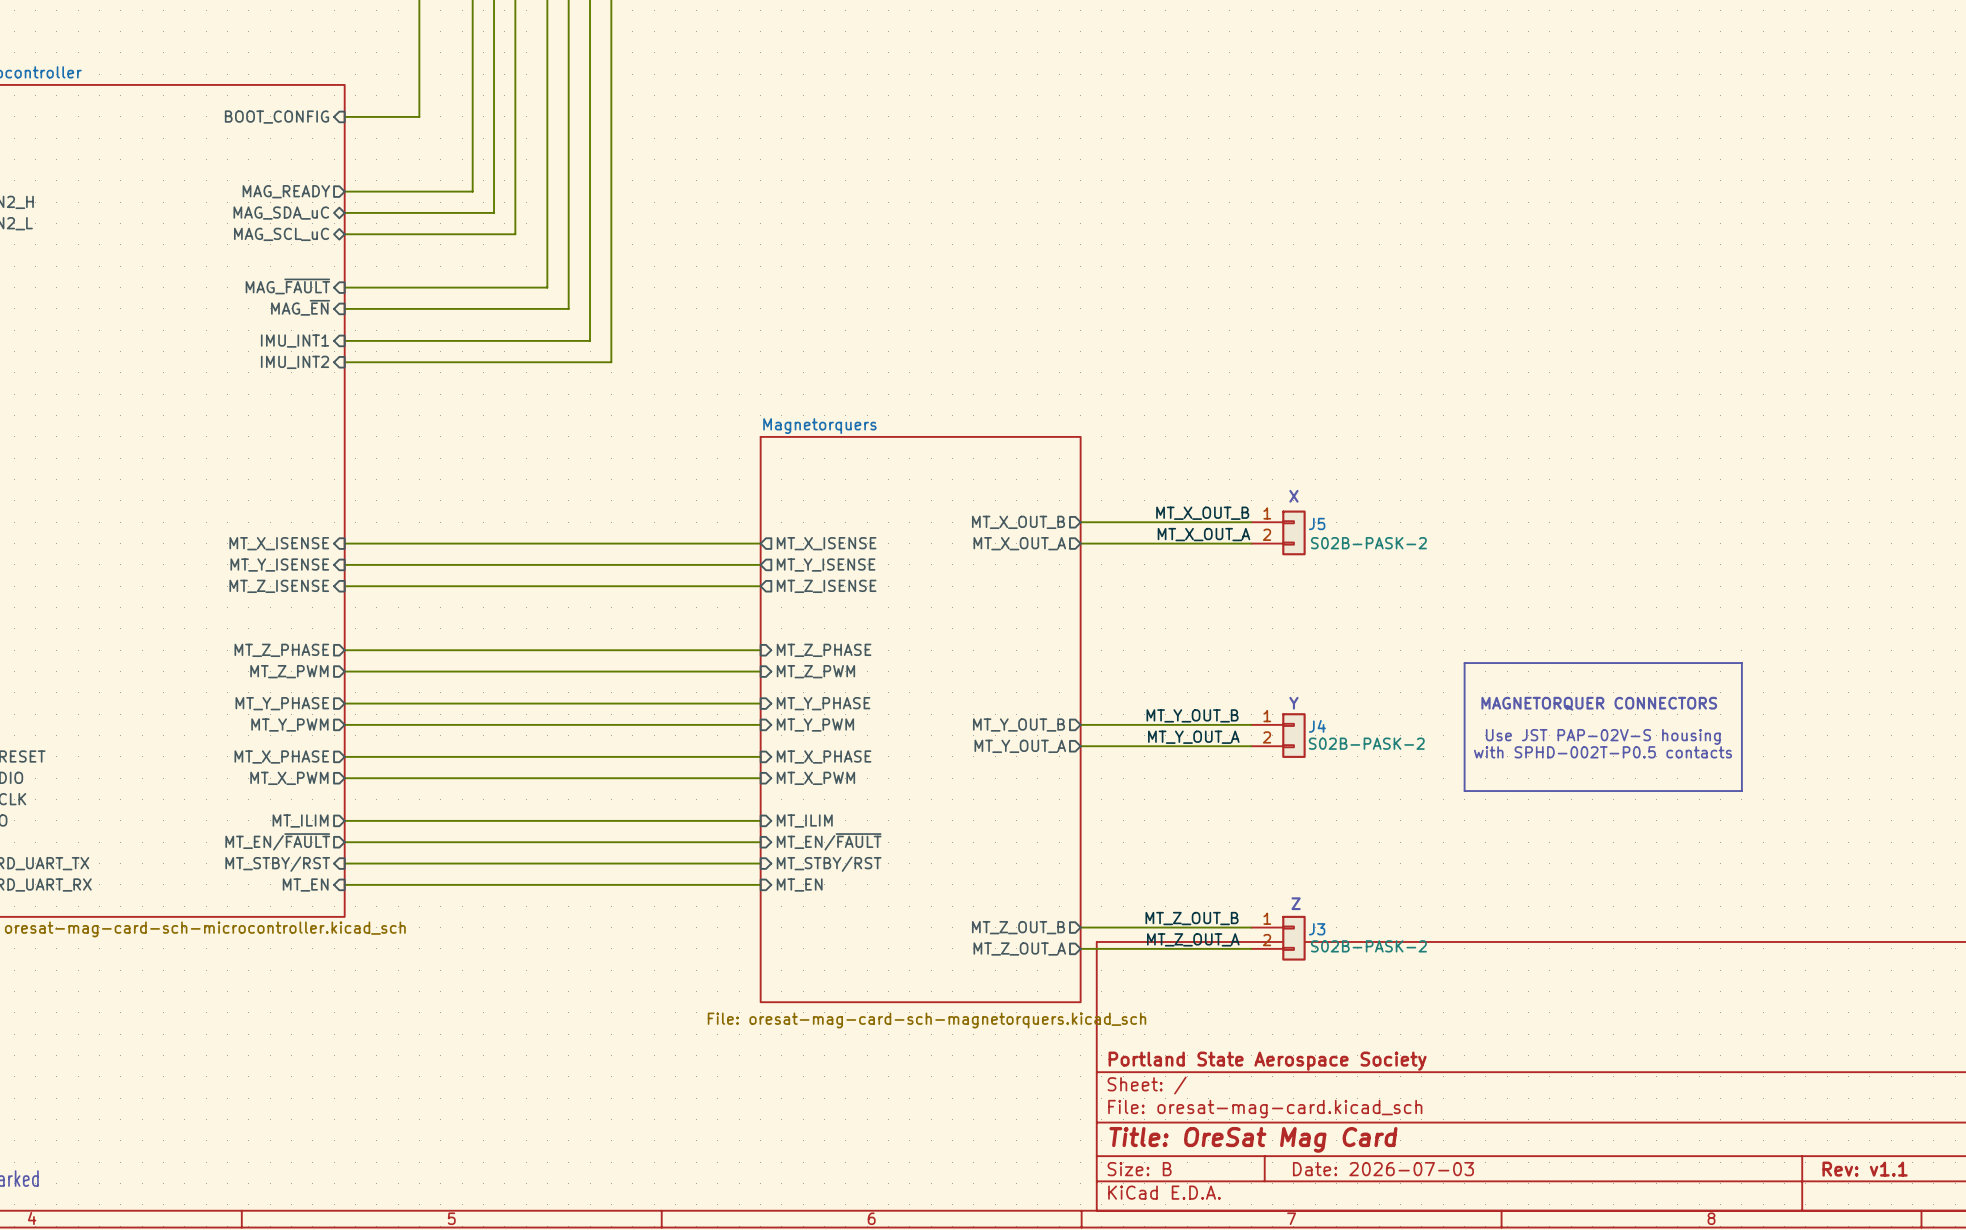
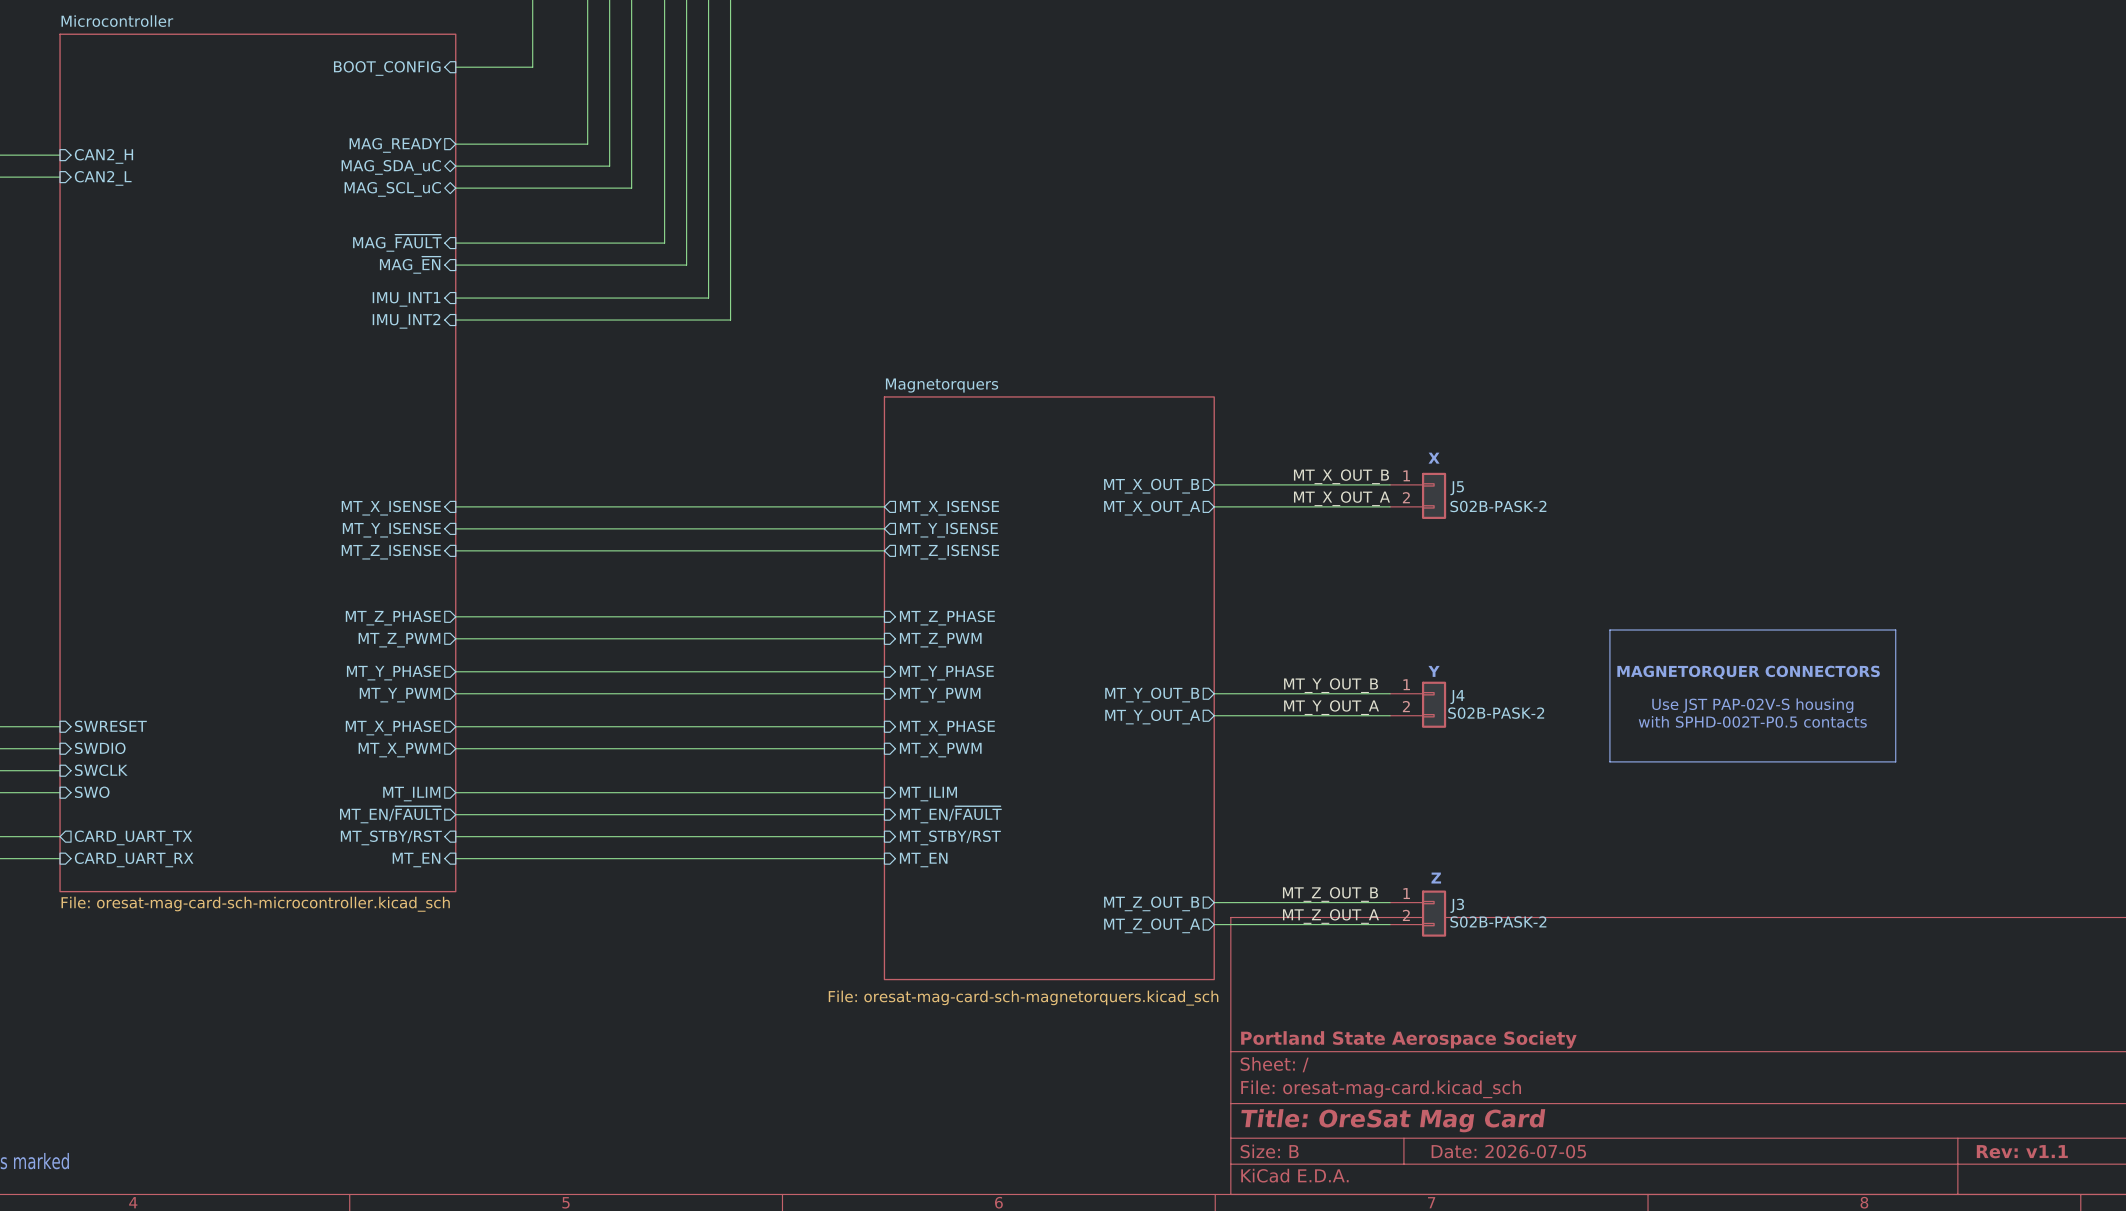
title block: Date: 2026-07-03 (1383, 1169) -> Date: 2026-07-05 (1508, 1151)

